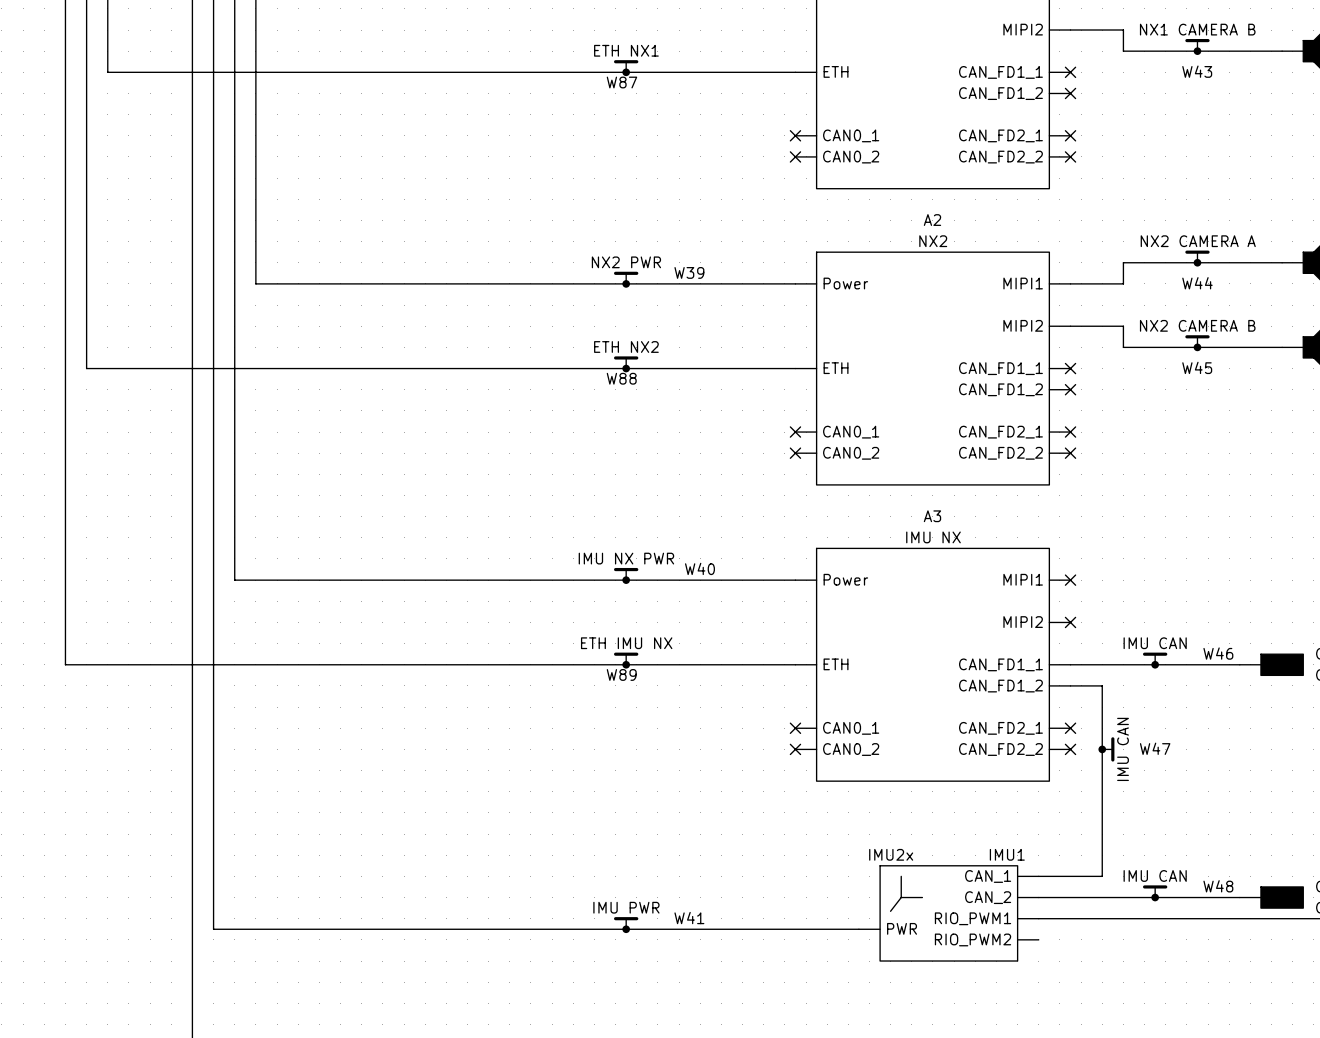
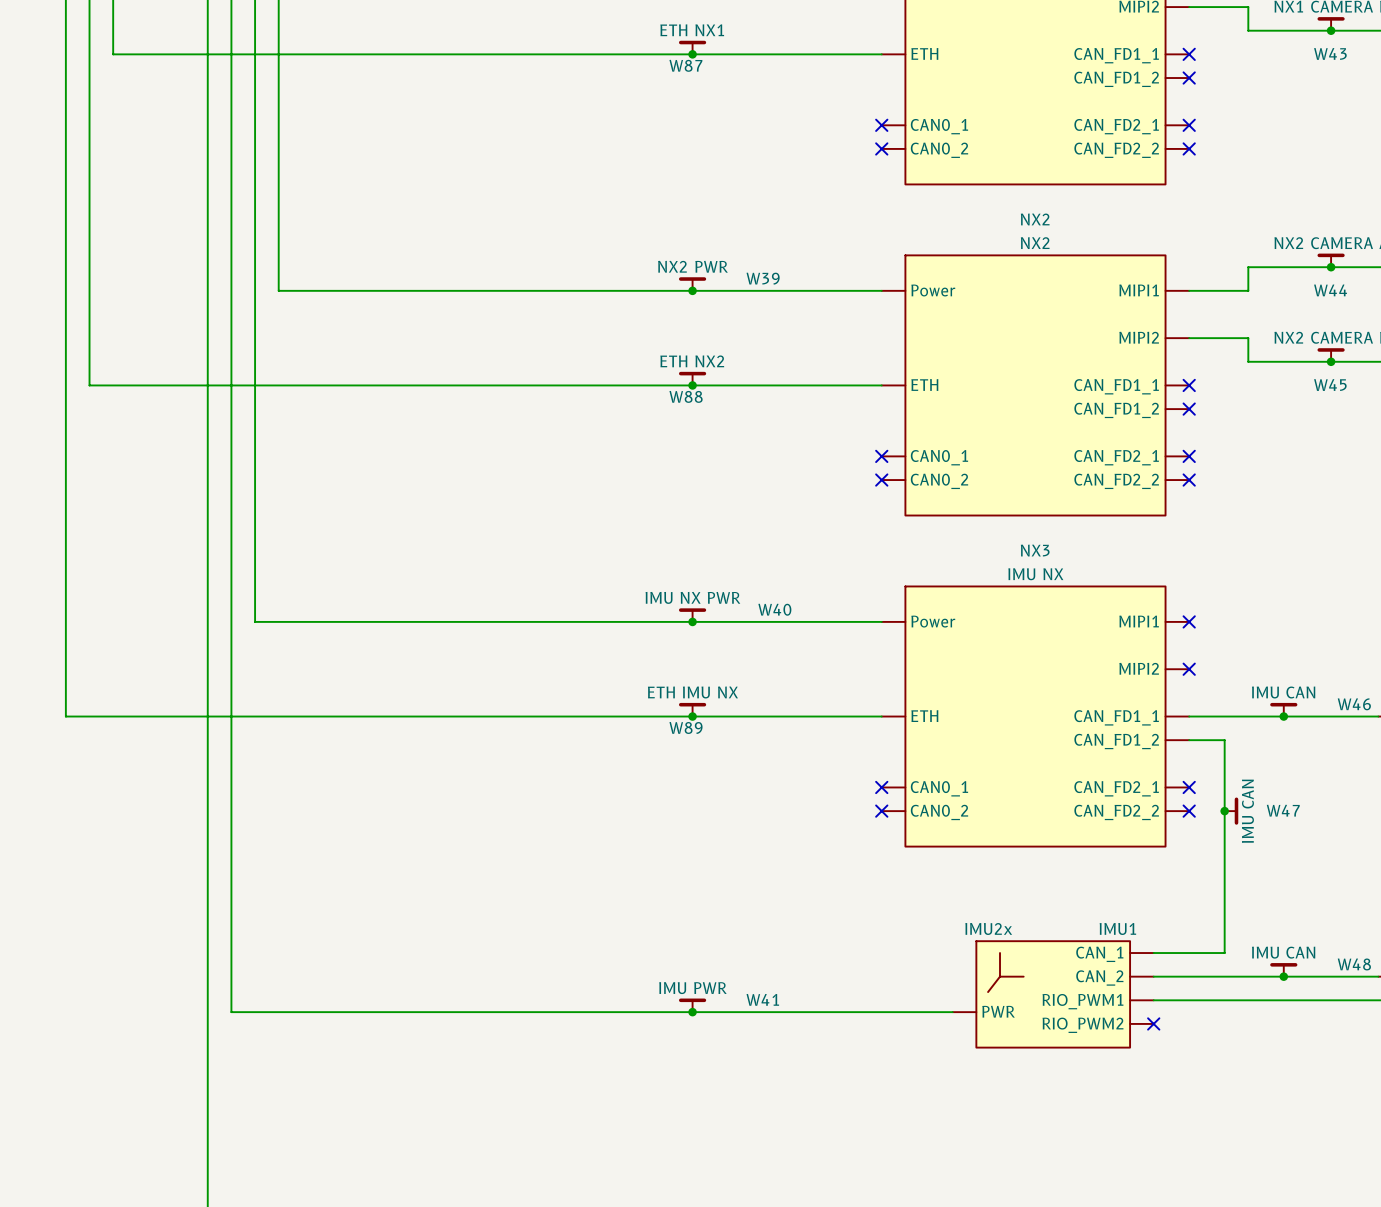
A2 name: A2 (932, 220) -> NX2 (1035, 219)
A3 name: A3 (932, 516) -> NX3 (1035, 550)
no-connect mark: none -> (1153, 1023)

